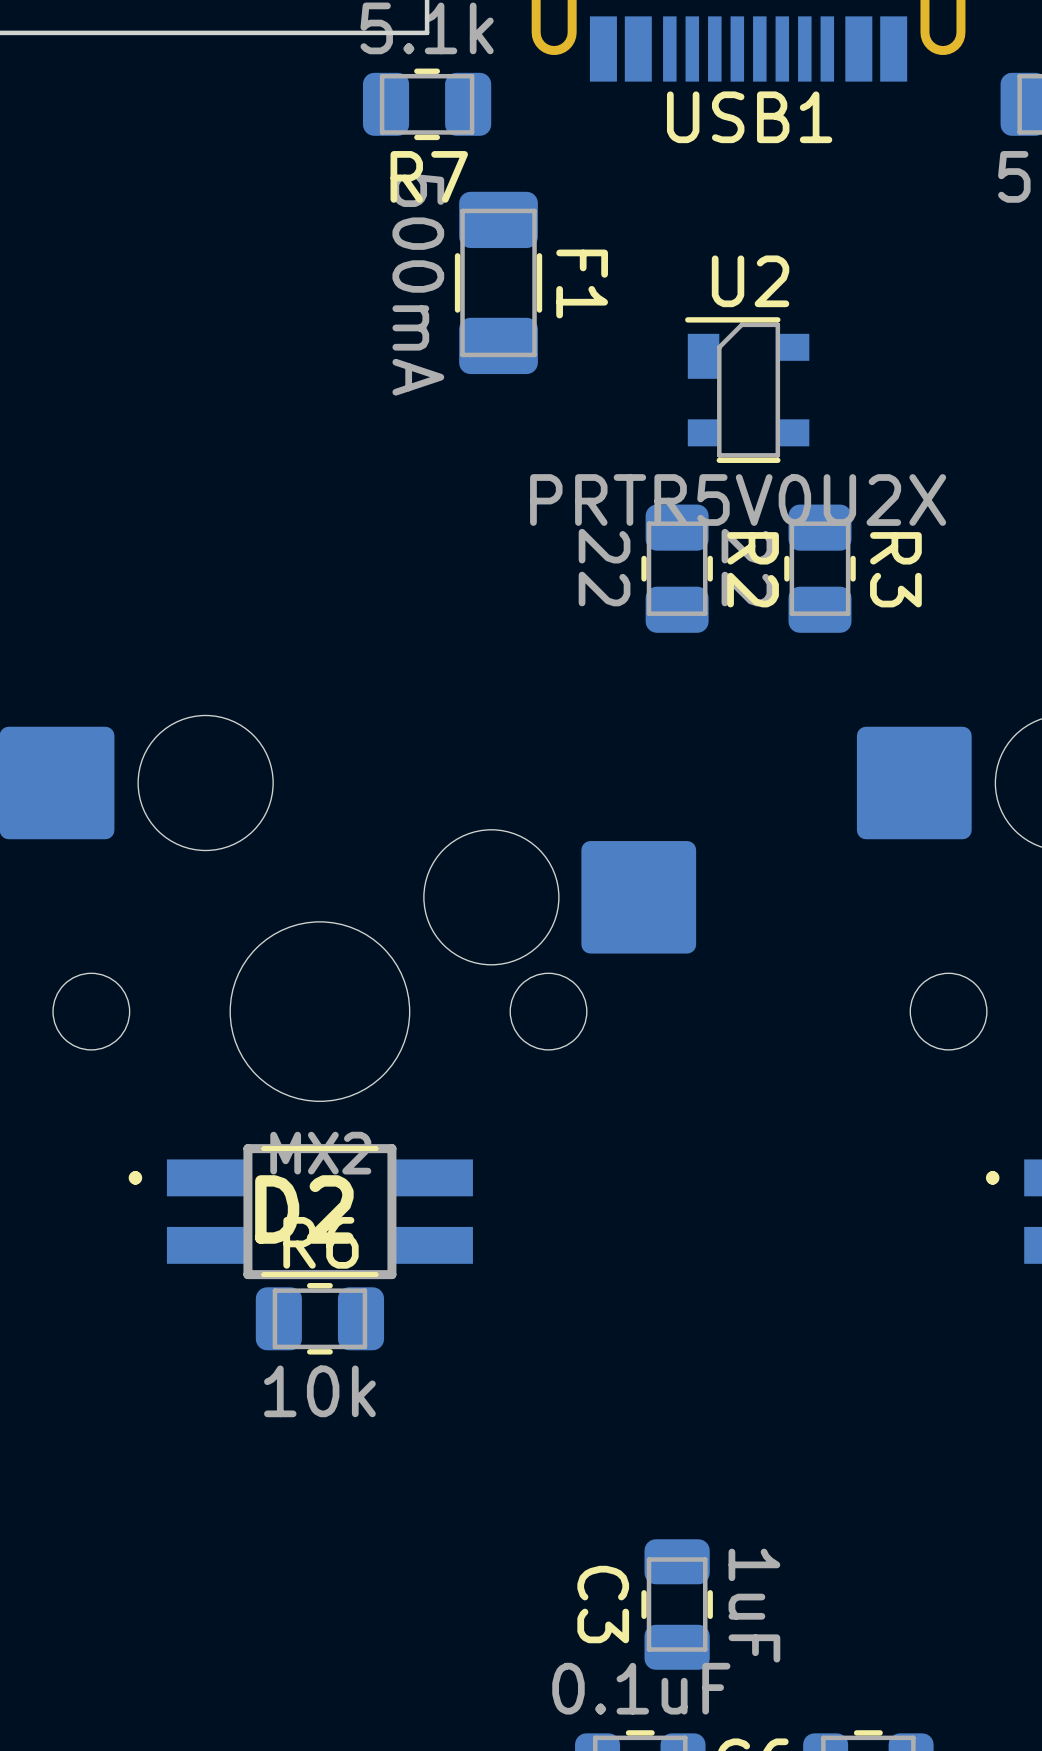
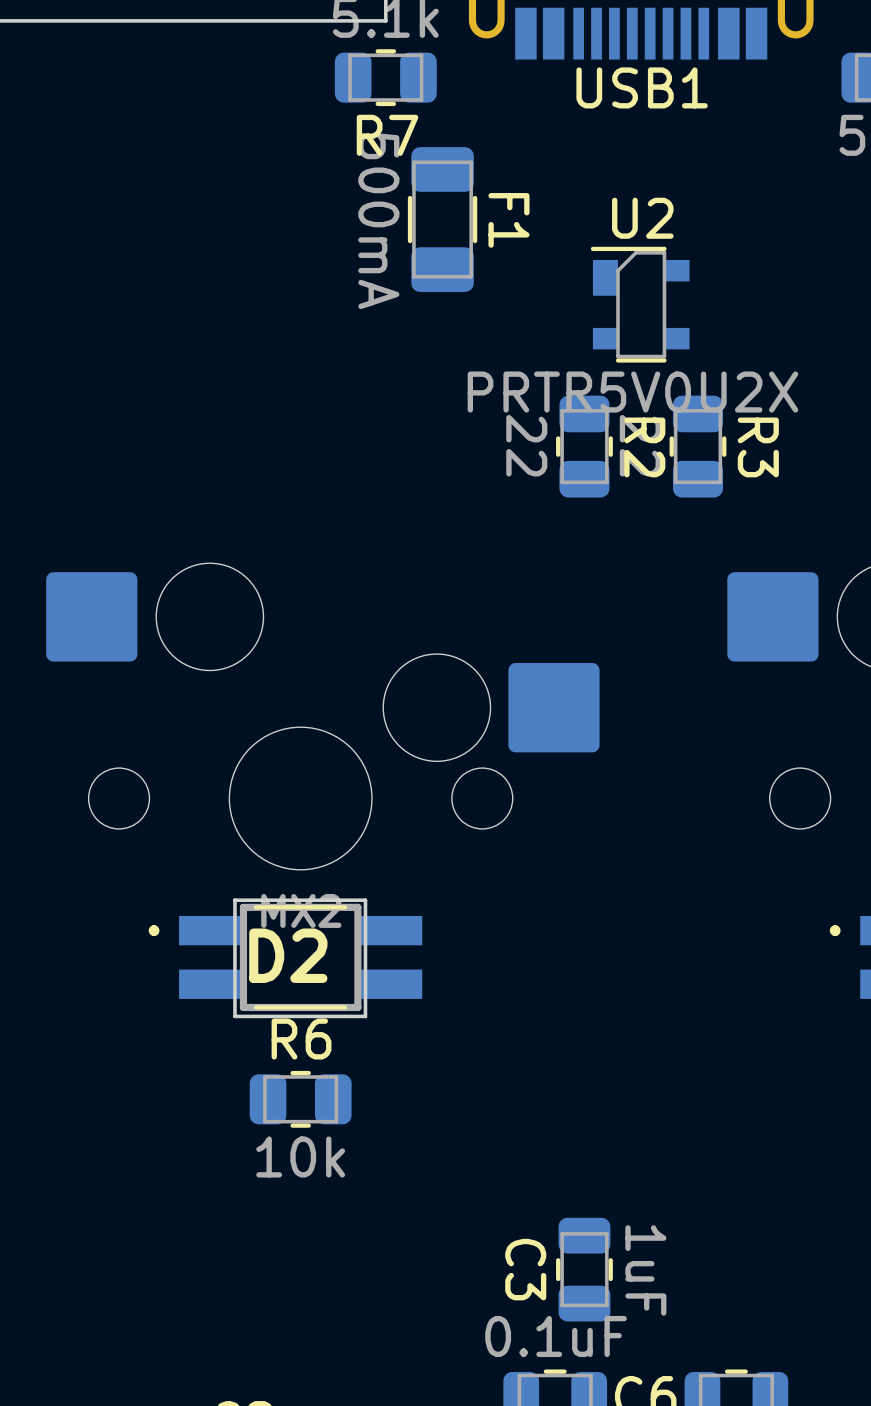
board edge: none -> (365, 900) (234, 900) (234, 1016) (365, 1016) (365, 900)
R6 position: (319, 1318) -> (300, 1099)

